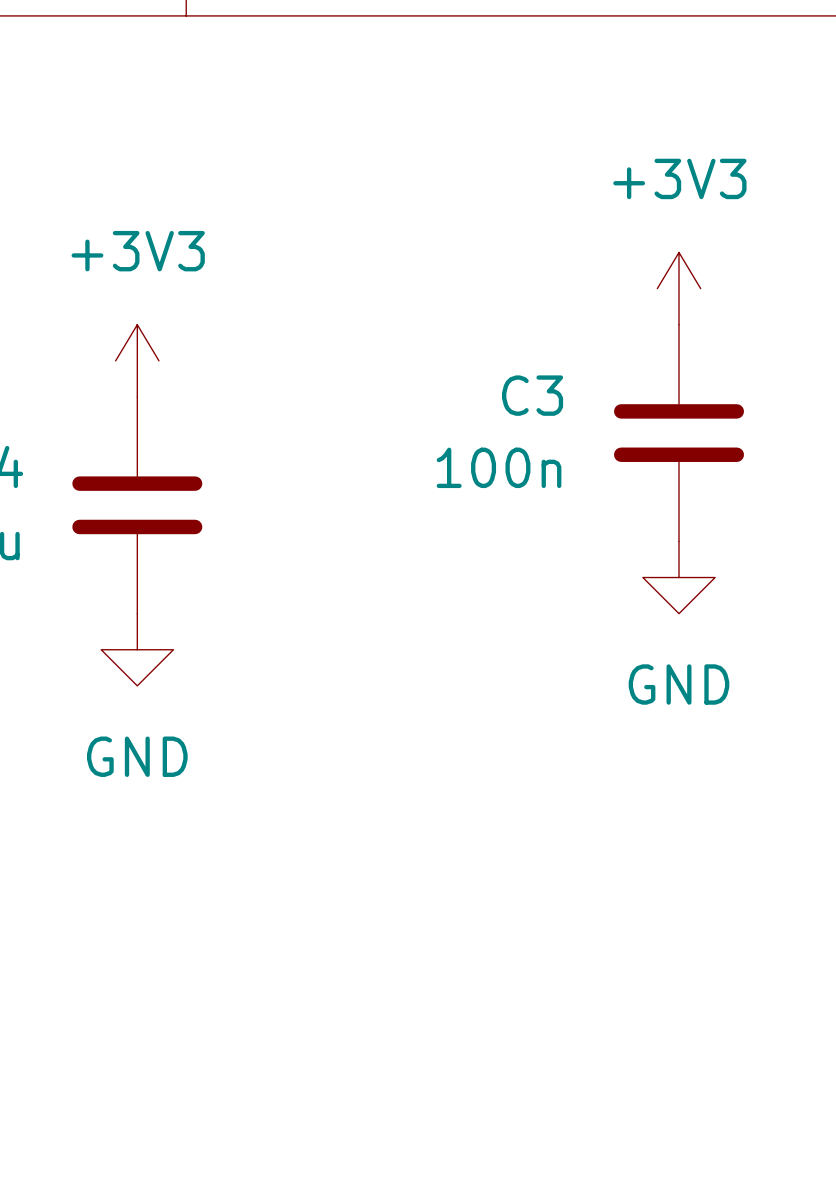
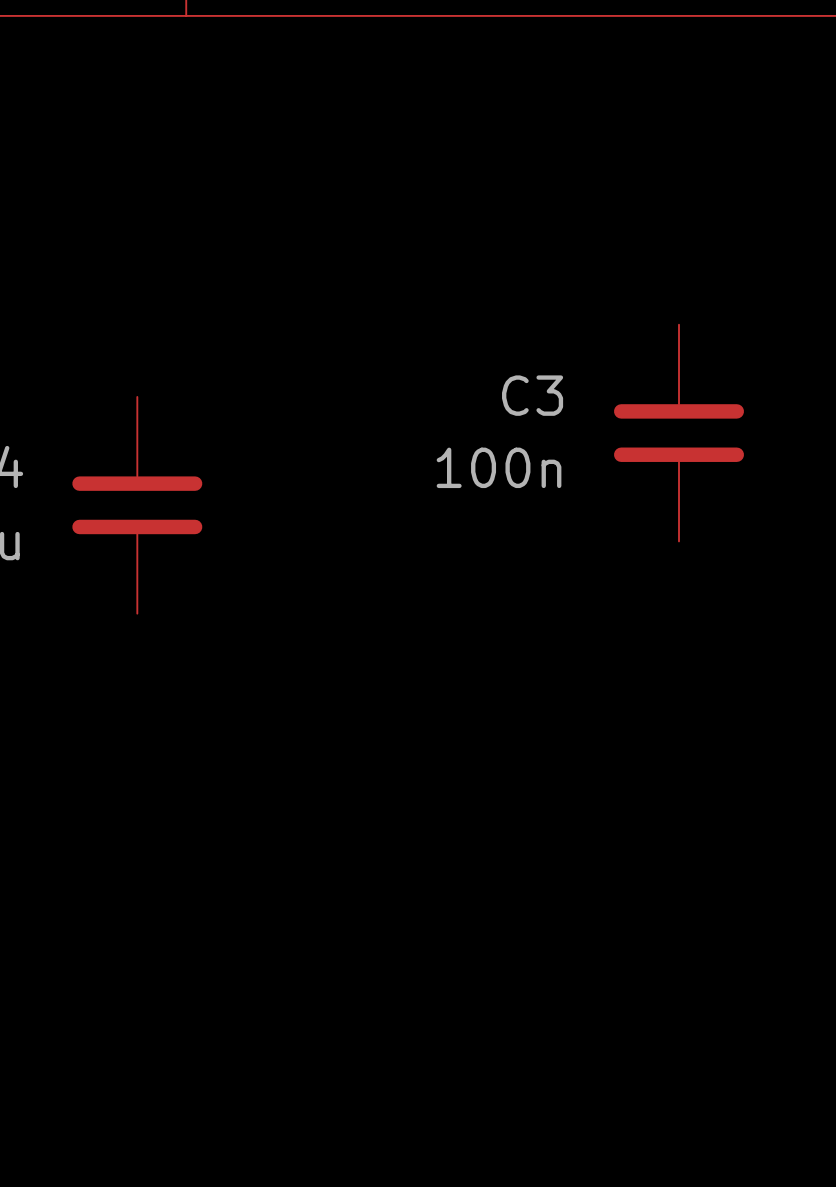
power symbol: +3V3 (679, 288) -> none
power symbol: +3V3 (137, 360) -> none
power symbol: GND (679, 577) -> none
power symbol: GND (137, 649) -> none

